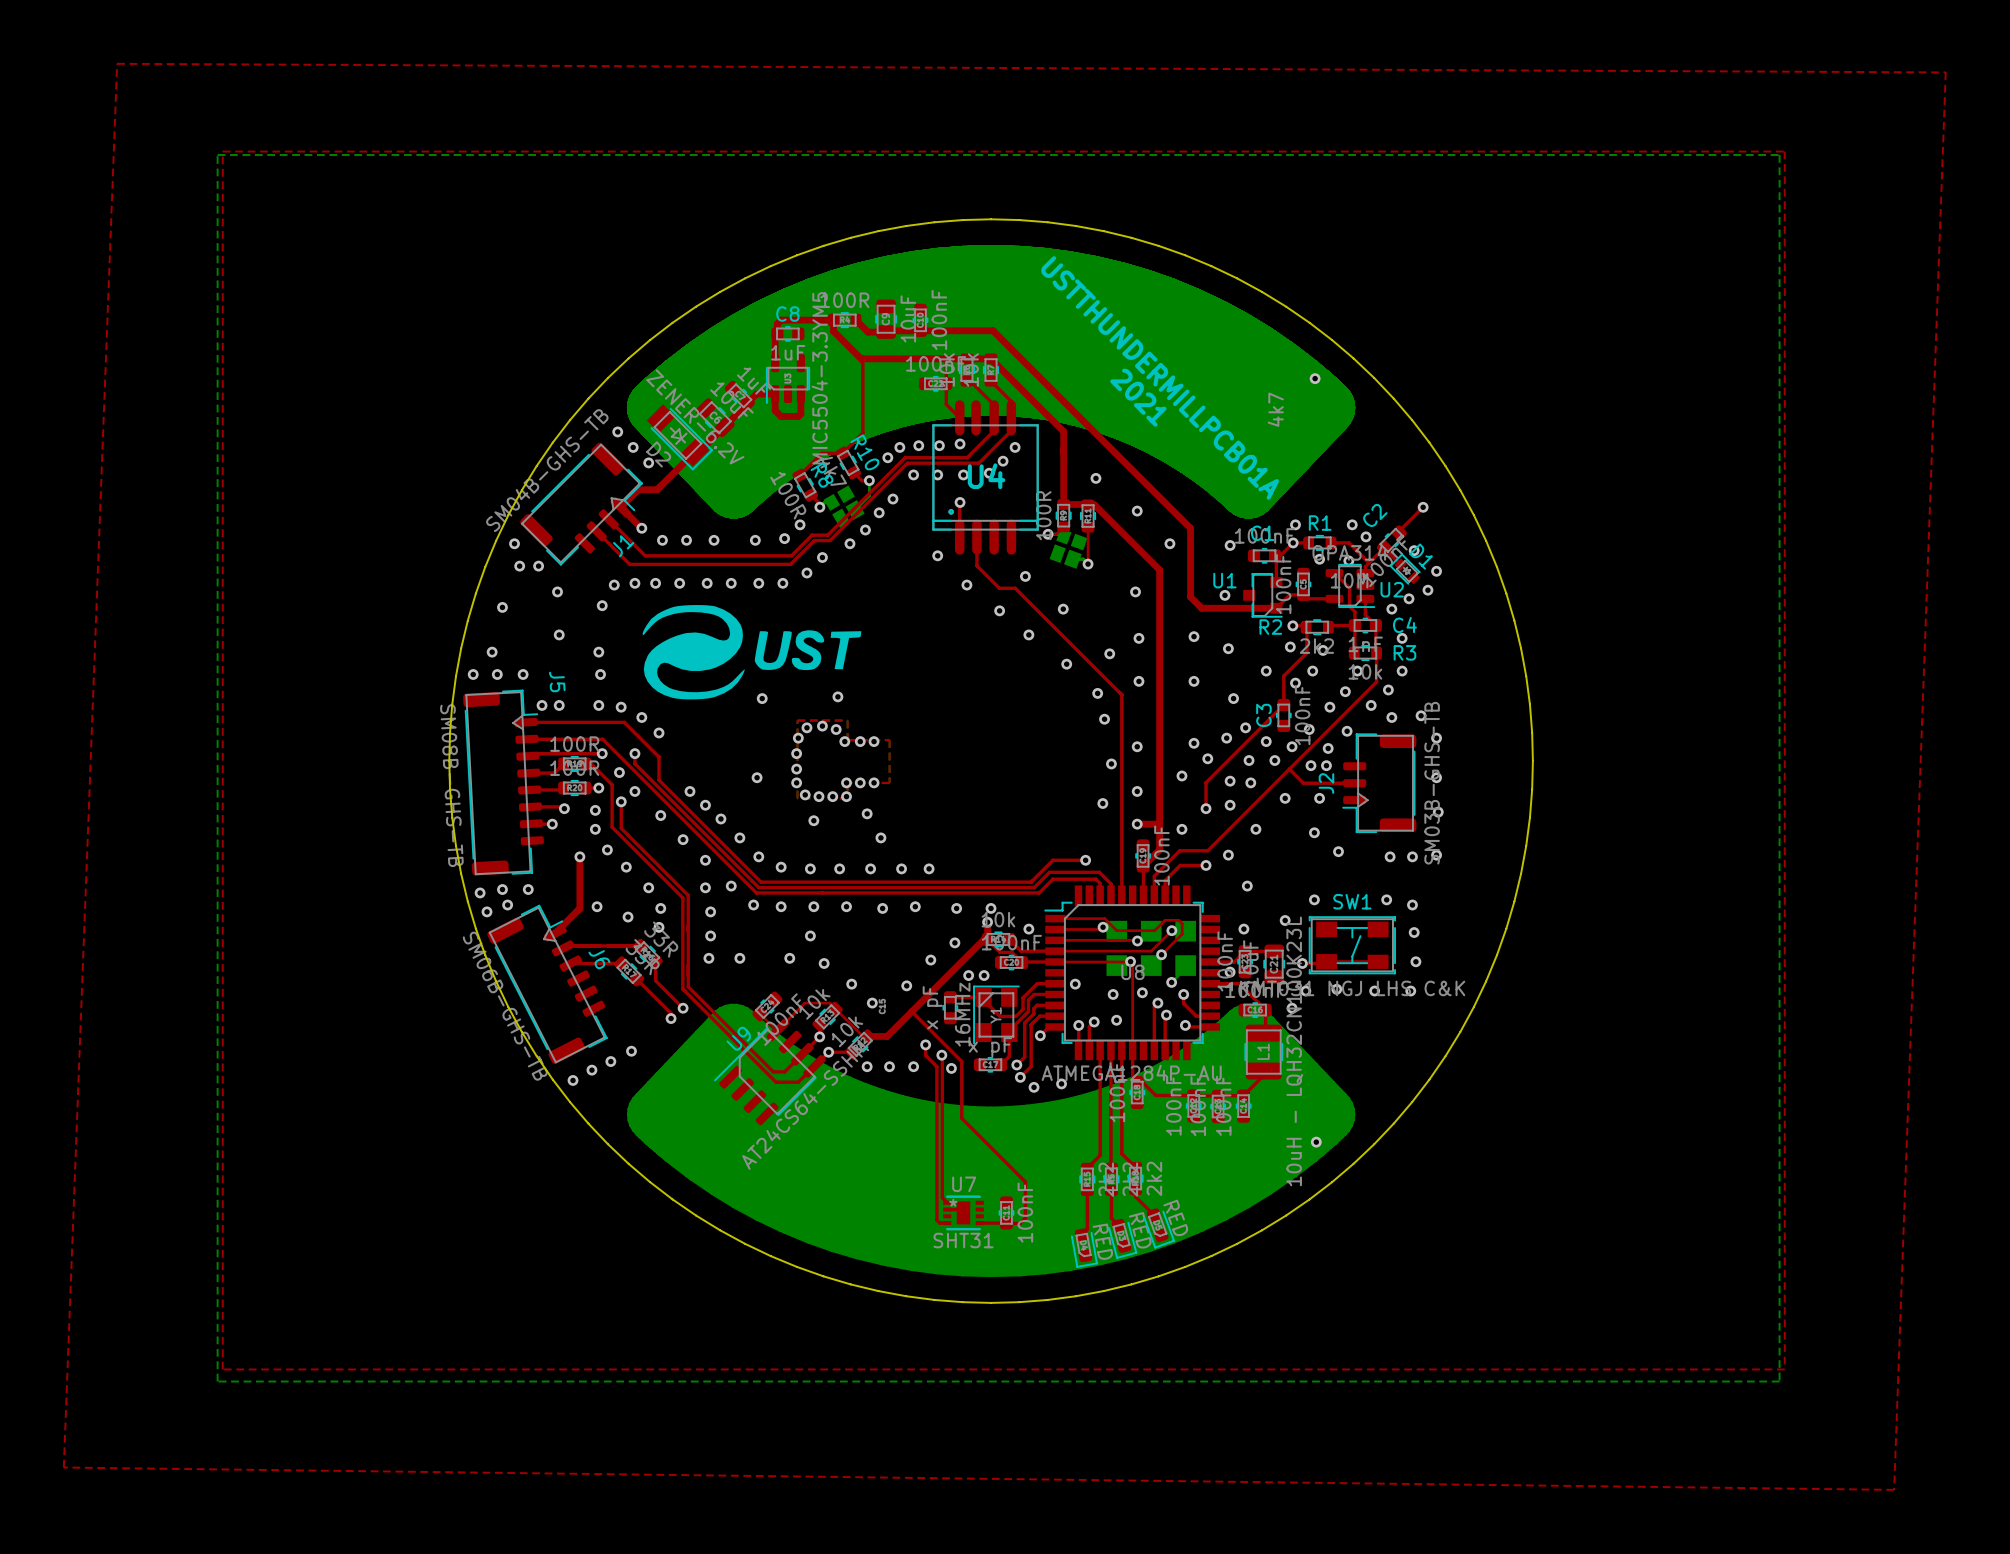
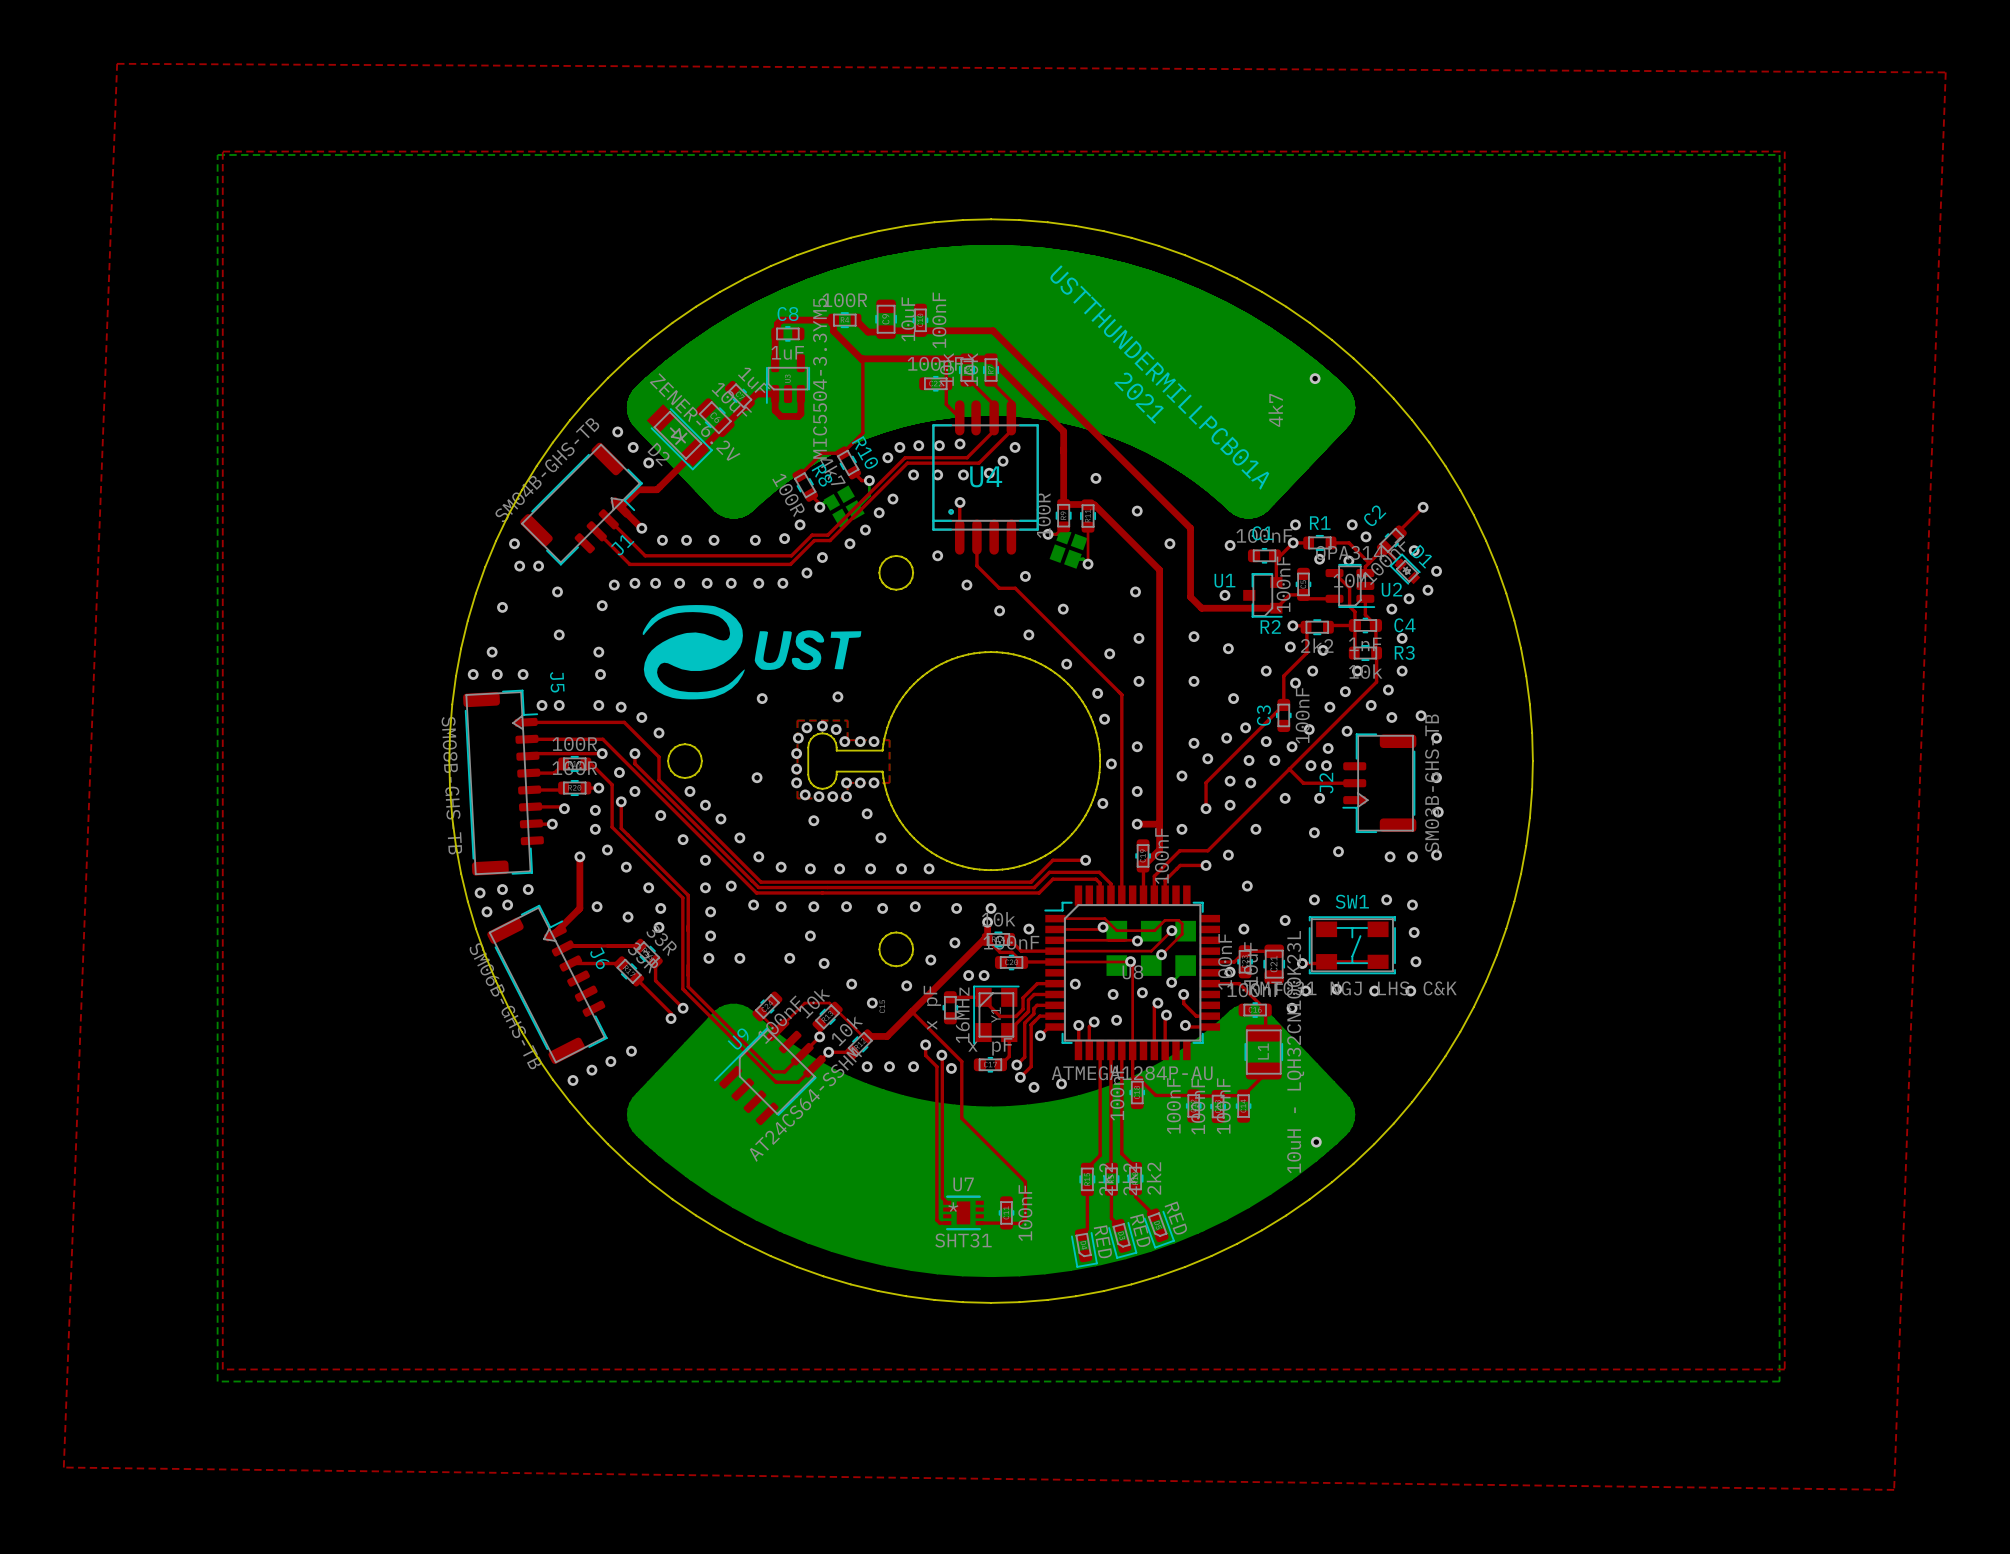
board edge: none -> (896, 555) (886, 559) (880, 567) (879, 572) (880, 578) (886, 586) (896, 589) (906, 586) (912, 578) (913, 572) (912, 567) (906, 559) (896, 555)
board edge: none -> (991, 652) (968, 654) (952, 659) (931, 669) (918, 680) (902, 697) (893, 711) (885, 732) (882, 750) (836, 750) (835, 743) (830, 736) (822, 733) (814, 736) (808, 747) (808, 774) (810, 783) (818, 788) (826, 788) (833, 783) (836, 771) (882, 771) (889, 800) (906, 829) (931, 852) (962, 866) (985, 869) (1013, 867) (1035, 860) (1055, 849) (1079, 825) (1094, 794) (1100, 761) (1094, 727) (1079, 697) (1055, 672) (1024, 657) (991, 652)
board edge: none -> (684, 744) (679, 745) (671, 751) (668, 761) (671, 771) (679, 777) (684, 778) (690, 777) (698, 771) (701, 761) (698, 751) (690, 745) (684, 744)
board edge: none -> (896, 932) (886, 935) (880, 944) (879, 949) (880, 954) (886, 963) (896, 966) (906, 963) (912, 954) (913, 949) (912, 944) (906, 935) (896, 932)

